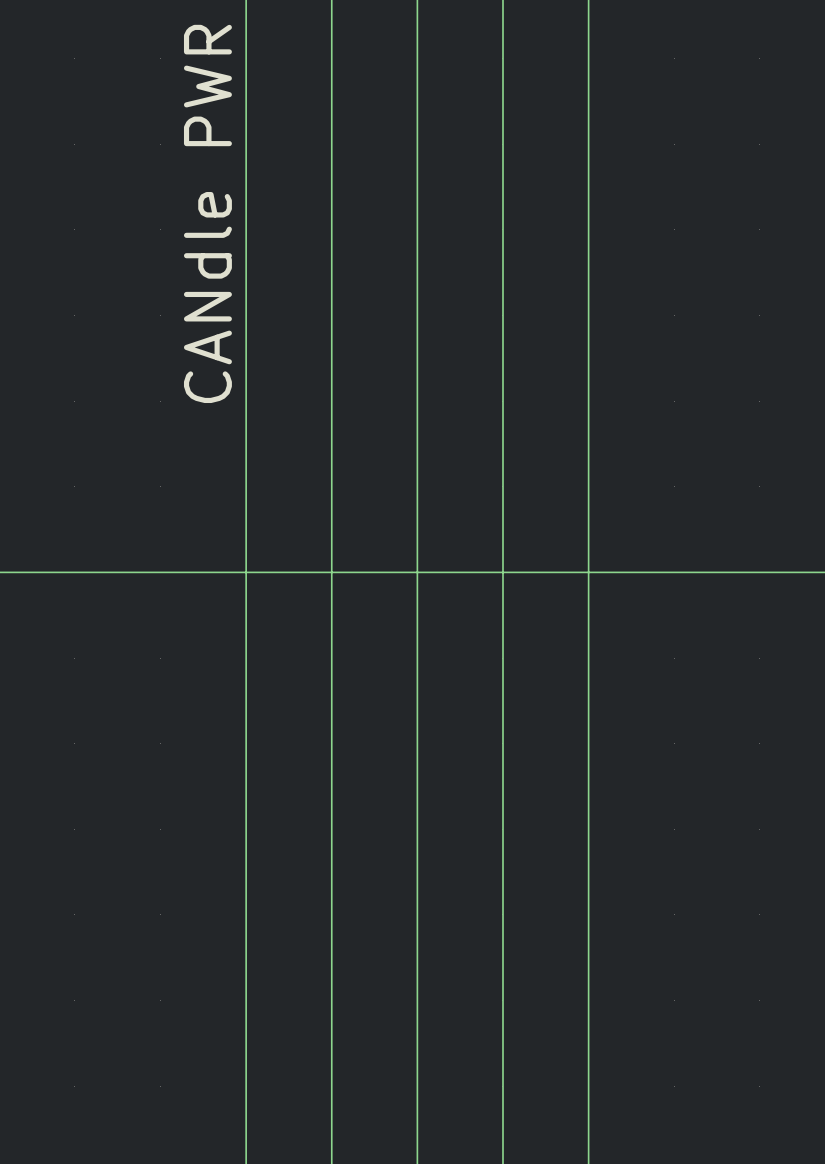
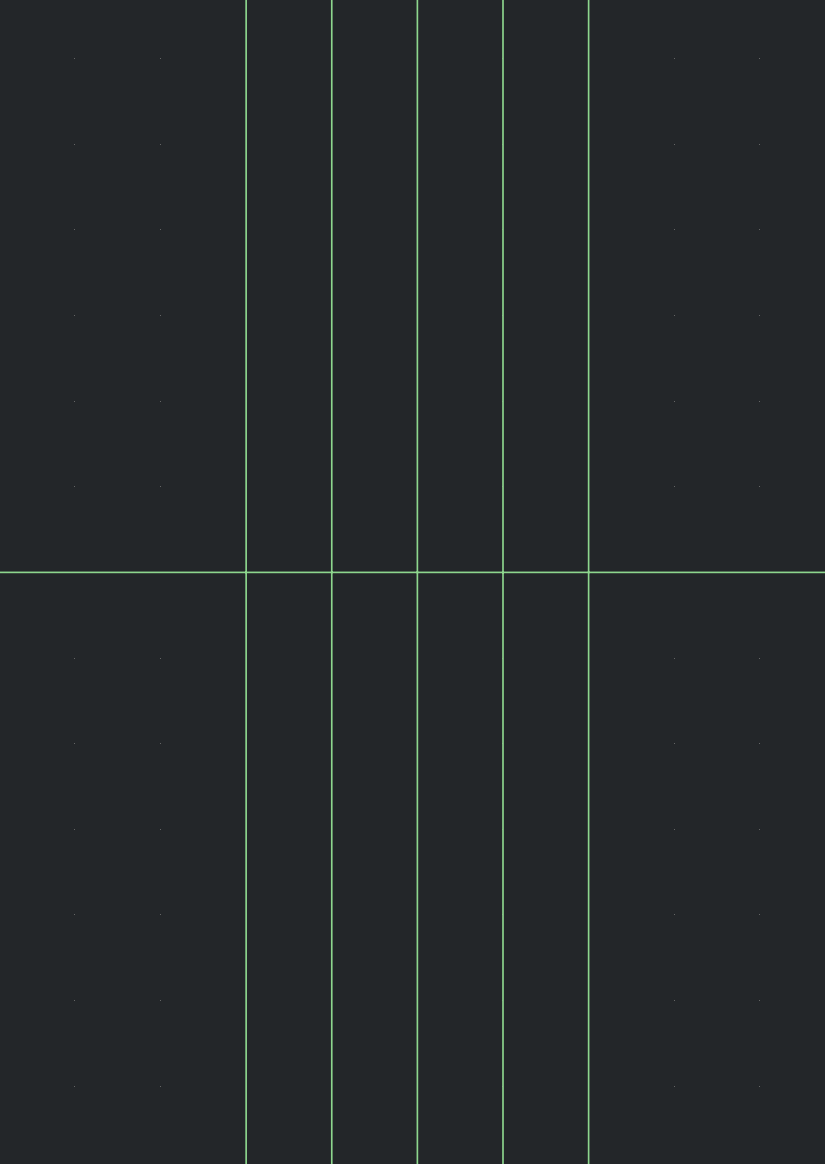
label: CANdle PWR (207, 213) -> none

